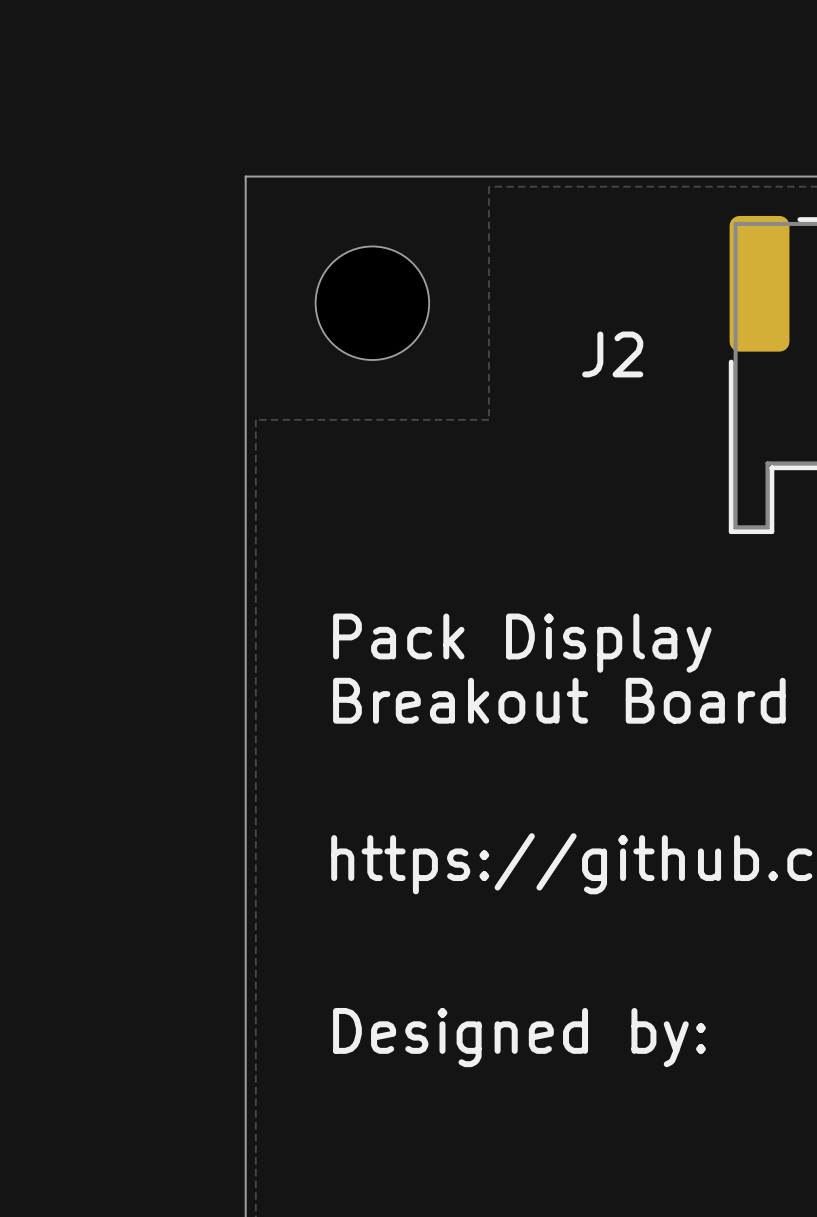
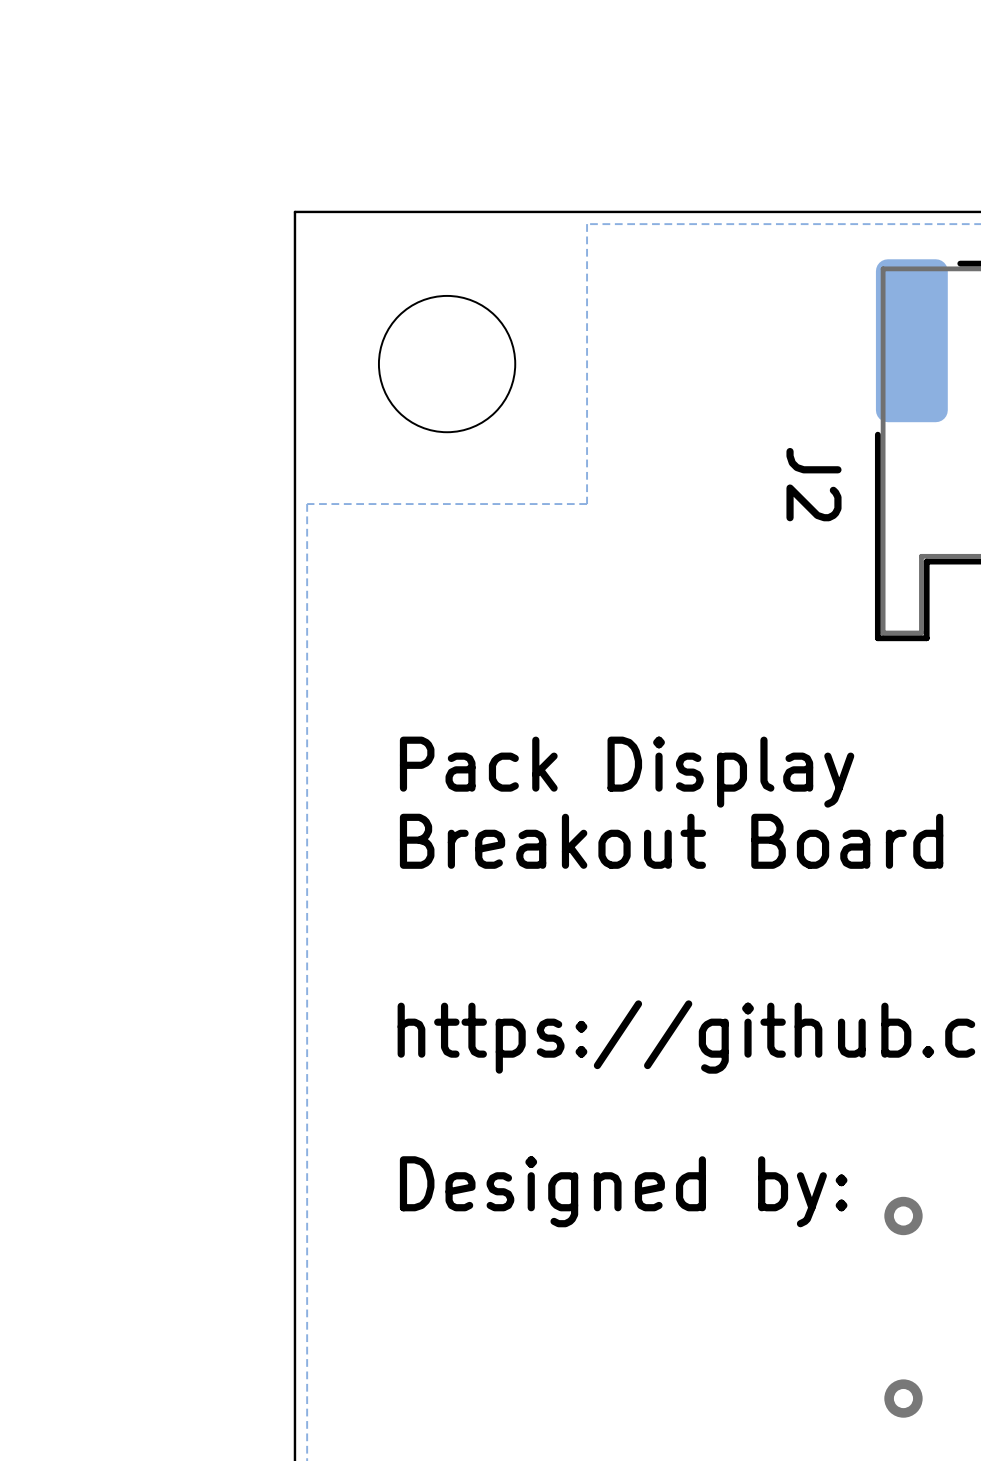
J2 name rotation: 0° (612, 354) -> 90° clockwise (813, 484)
via: none -> (903, 1215)
text position: Designed by: (519, 1037) -> Designed by: (623, 1191)
via: none -> (903, 1398)

